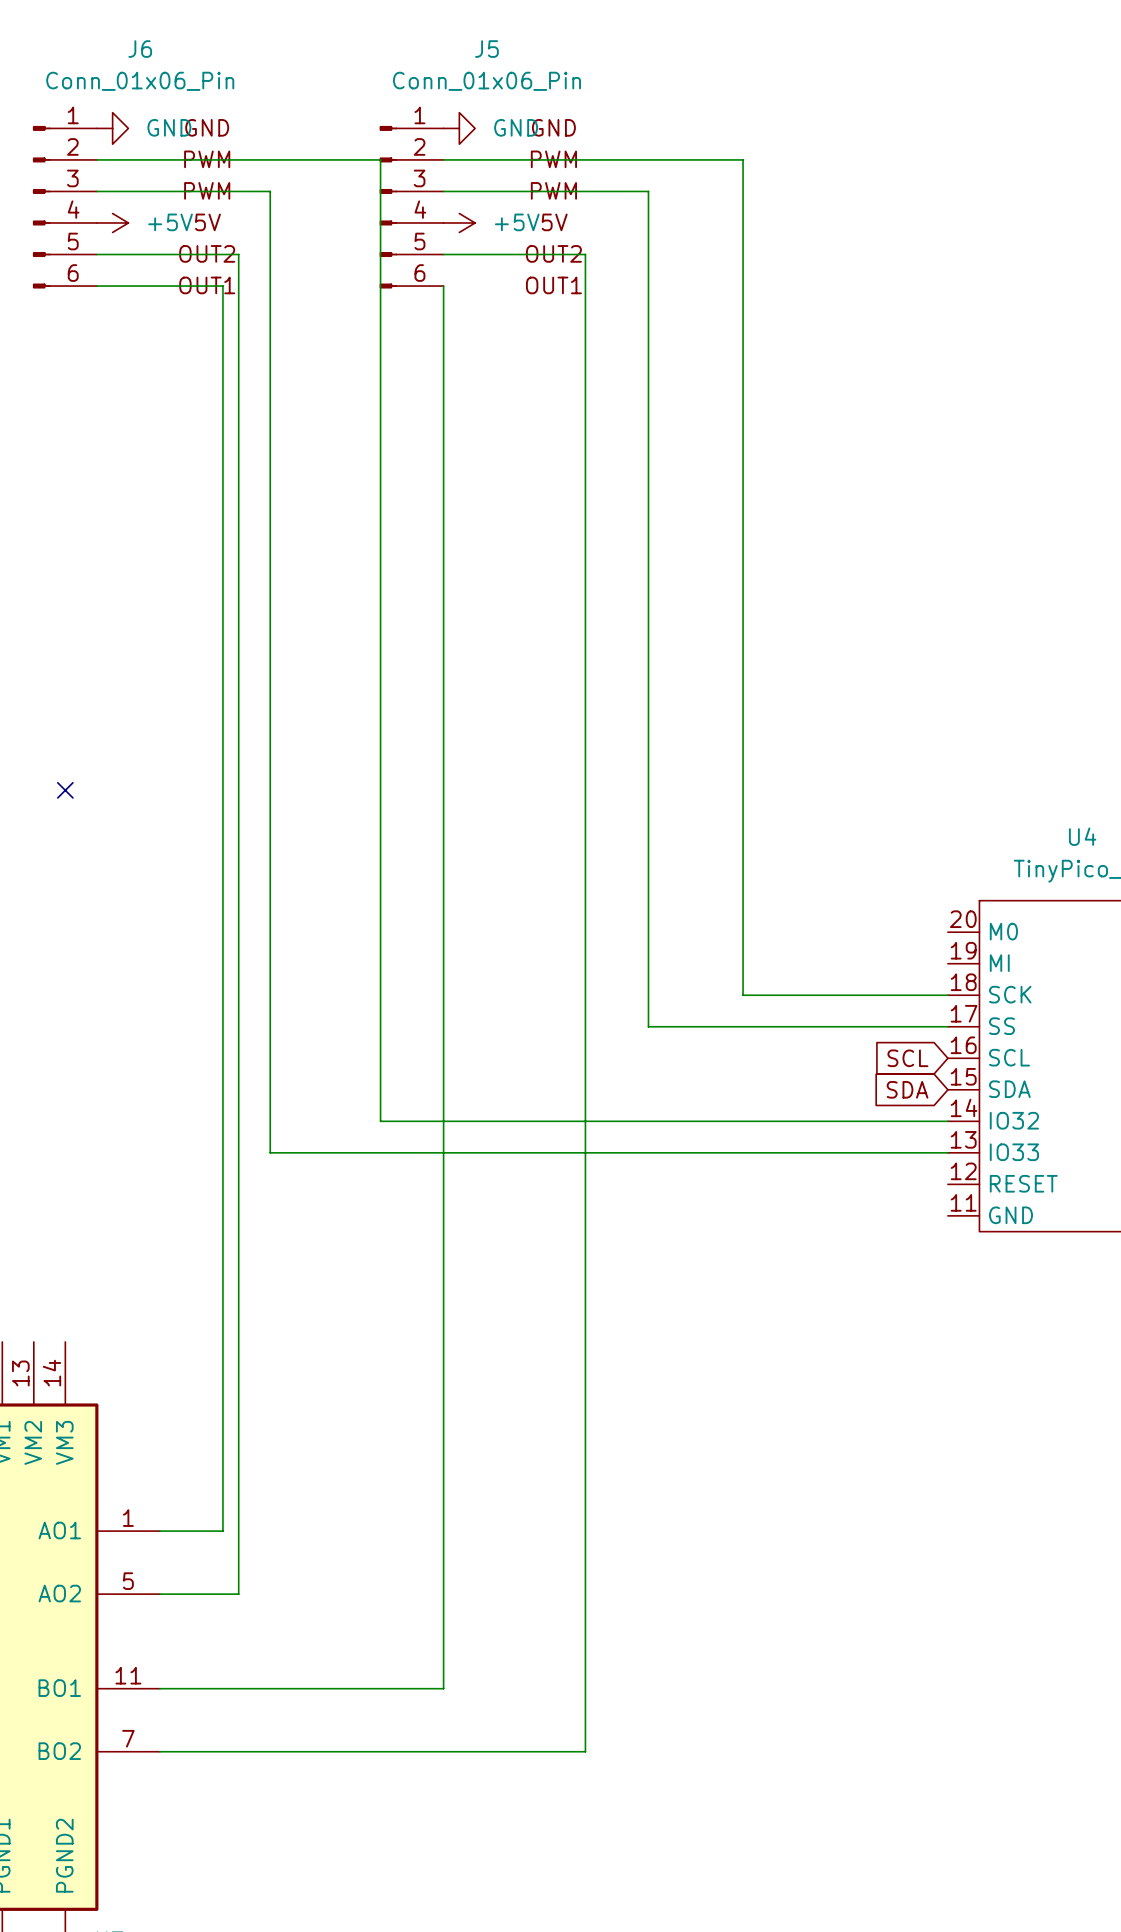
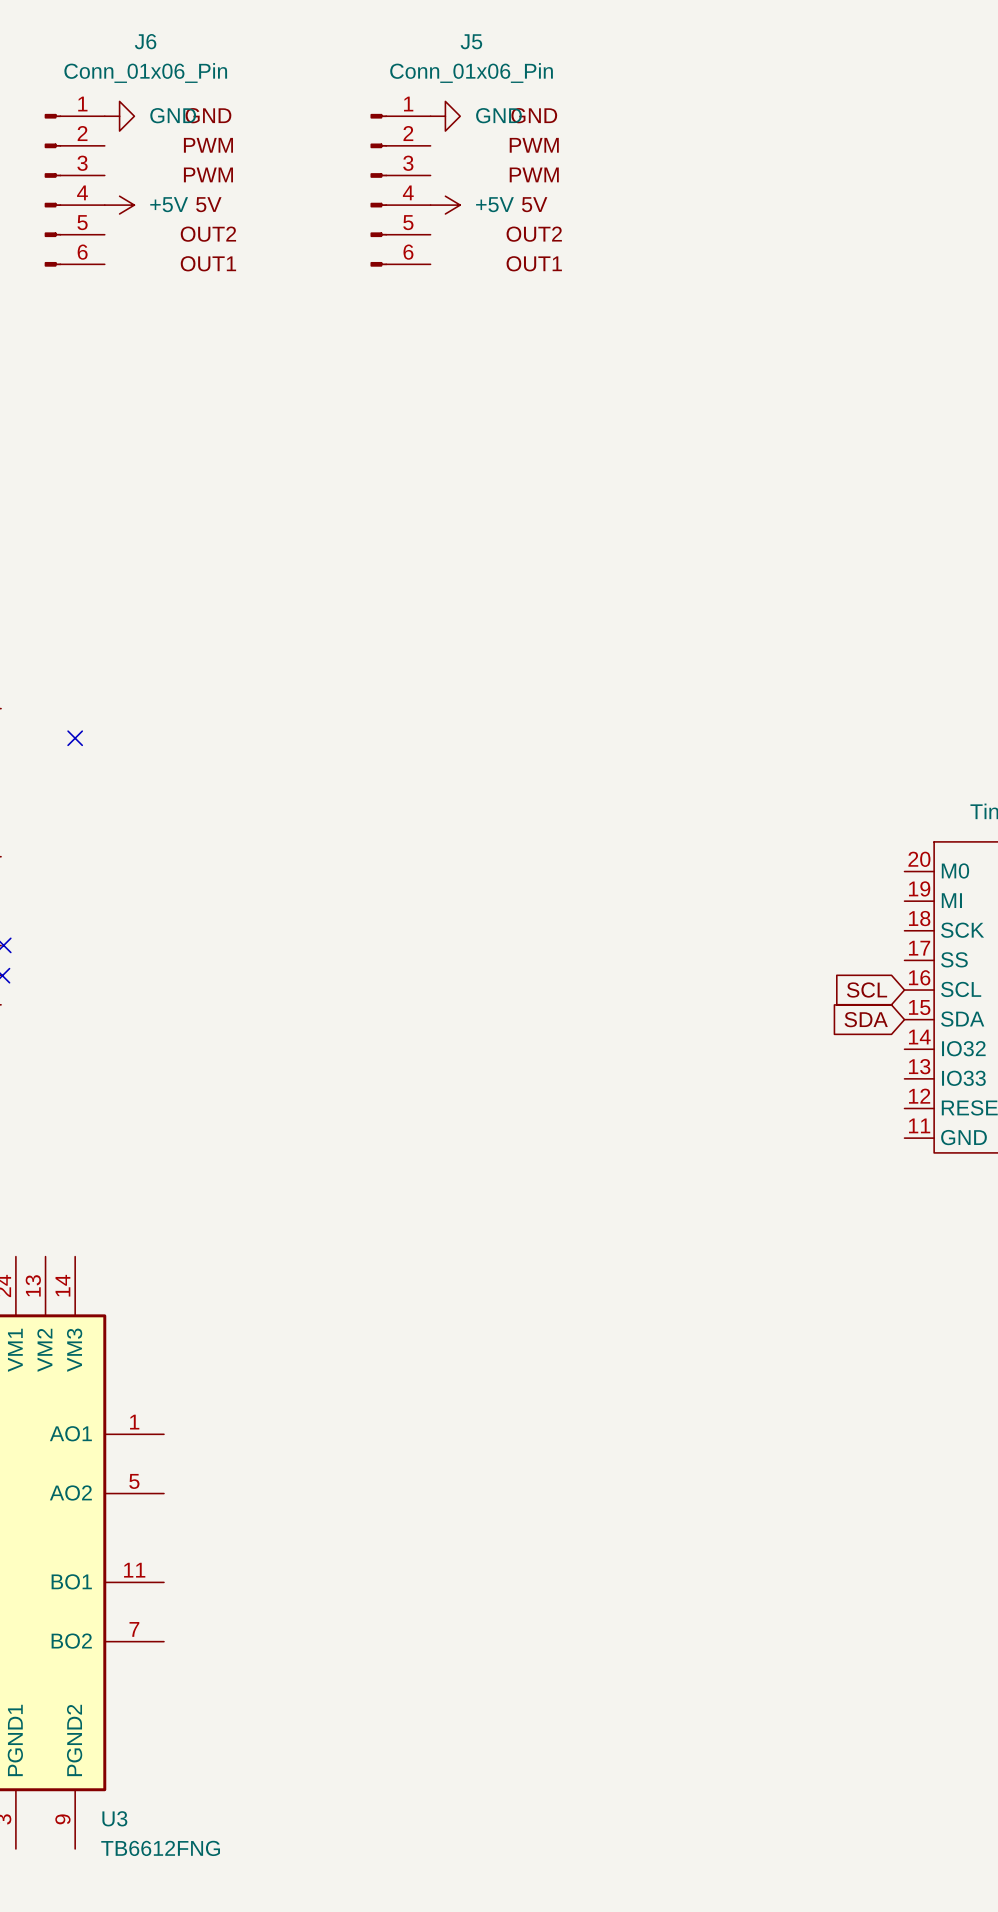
wire: (96, 159) (380, 159) (380, 1121) (947, 1121) -> none
wire: (443, 159) (743, 159) (743, 995) (947, 995) -> none
wire: (96, 191) (270, 191) (270, 1152) (947, 1152) -> none
wire: (443, 191) (648, 191) (648, 1026) (947, 1026) -> none
wire: (96, 254) (238, 254) (238, 1594) (159, 1594) -> none
wire: (443, 254) (585, 254) (585, 1751) (159, 1751) -> none
wire: (96, 286) (222, 286) (222, 1531) (159, 1531) -> none
wire: (443, 286) (443, 1688) (159, 1688) -> none

